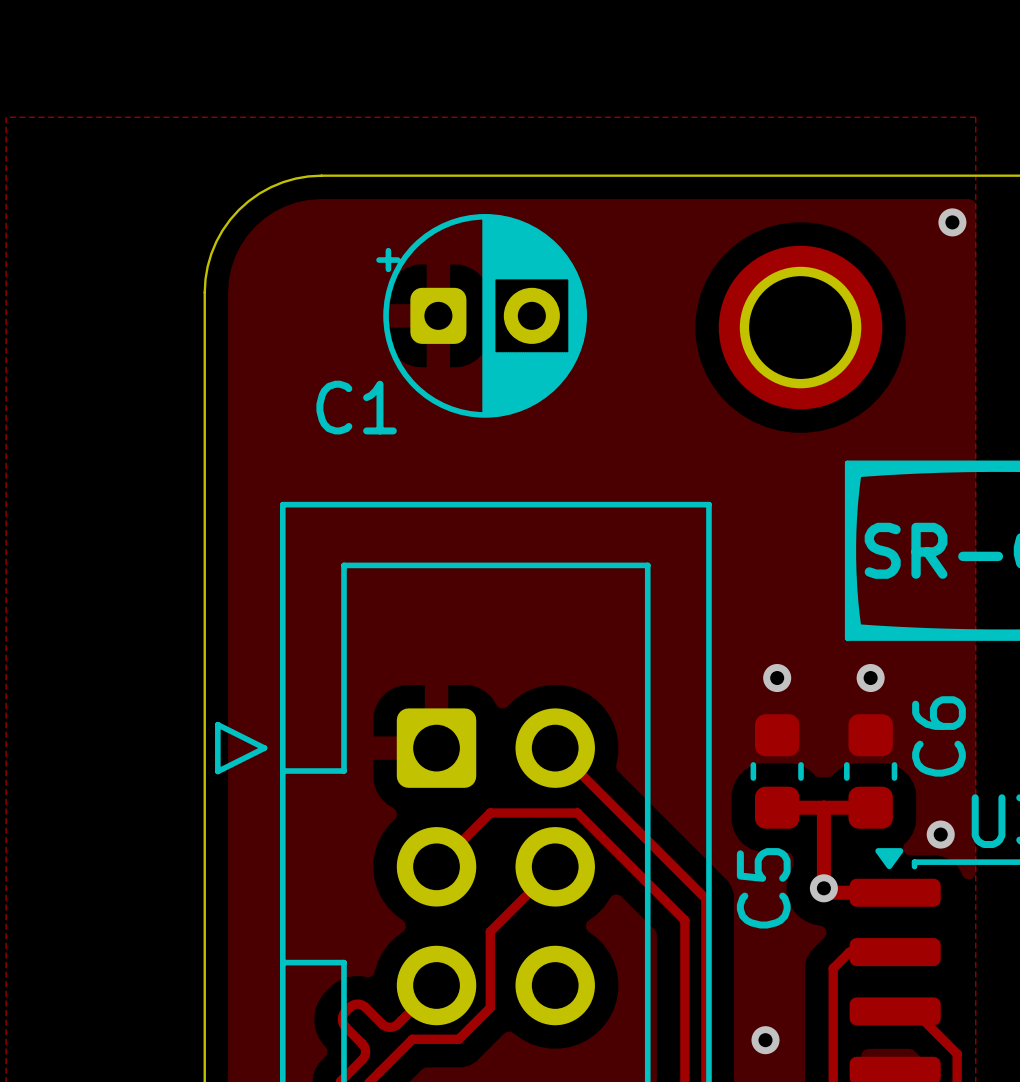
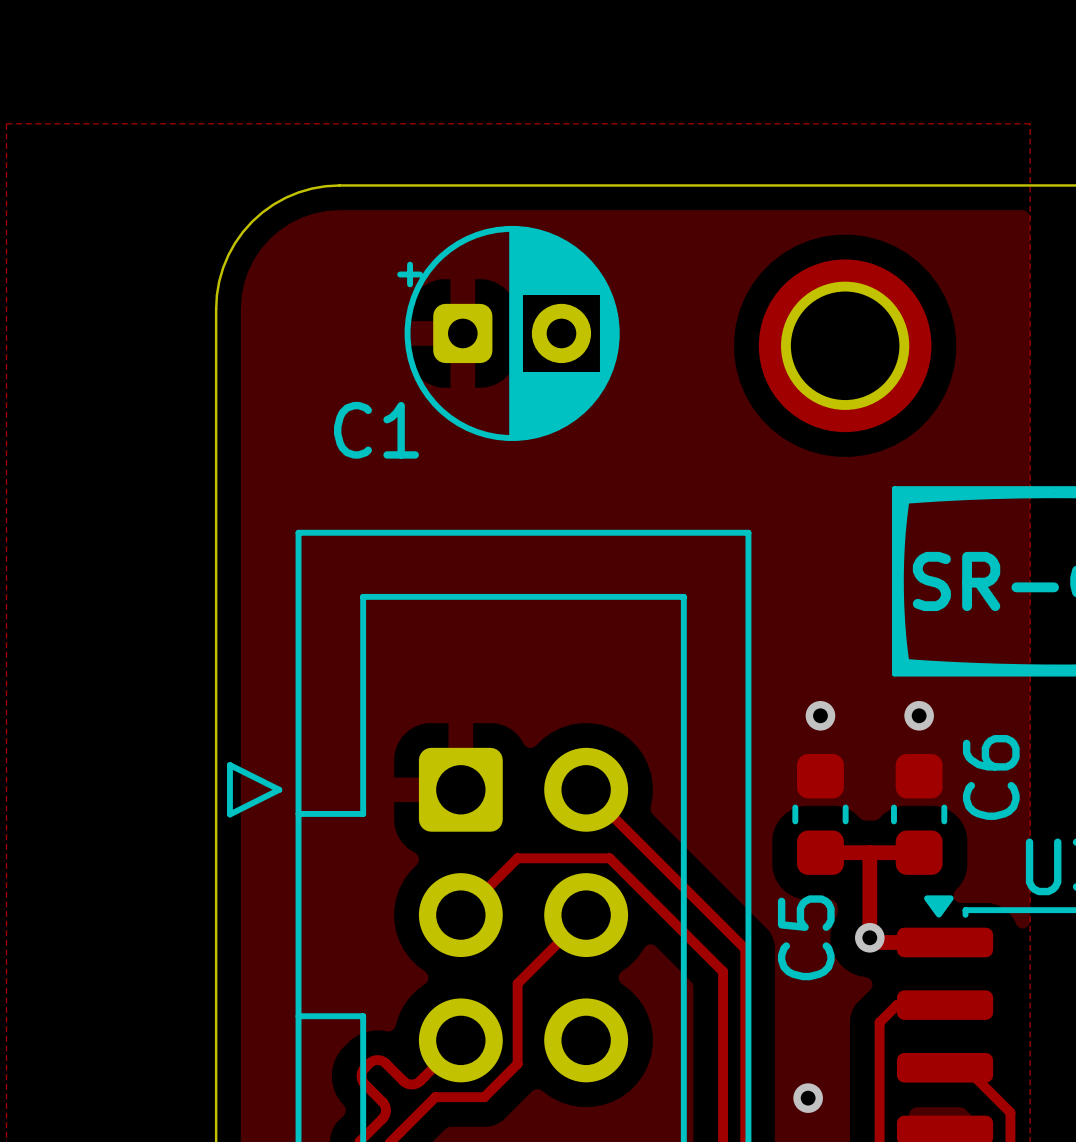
via: (952, 222) -> none
via: (940, 834) -> none

